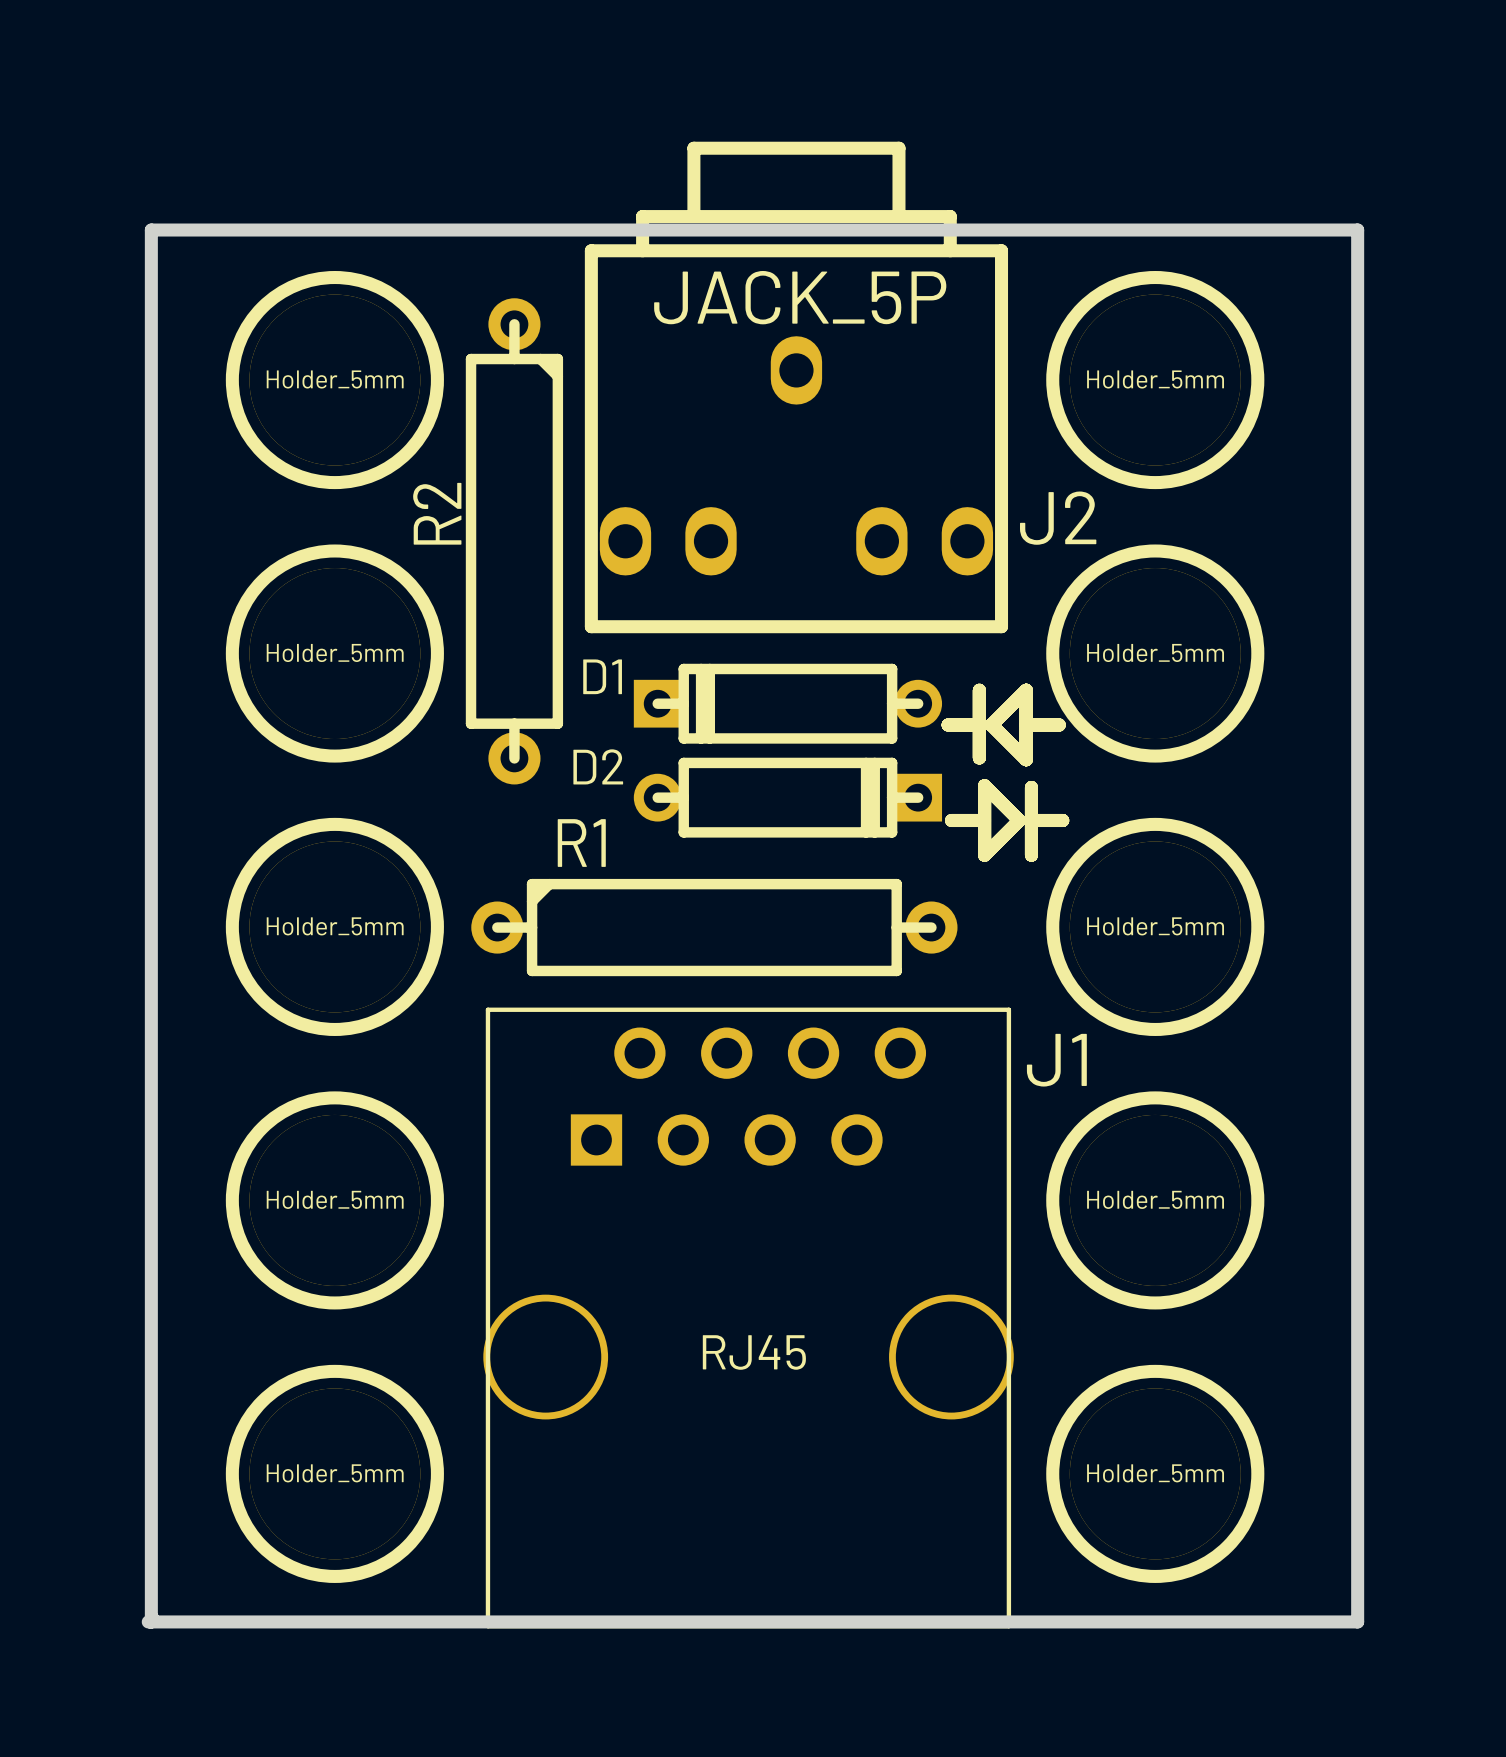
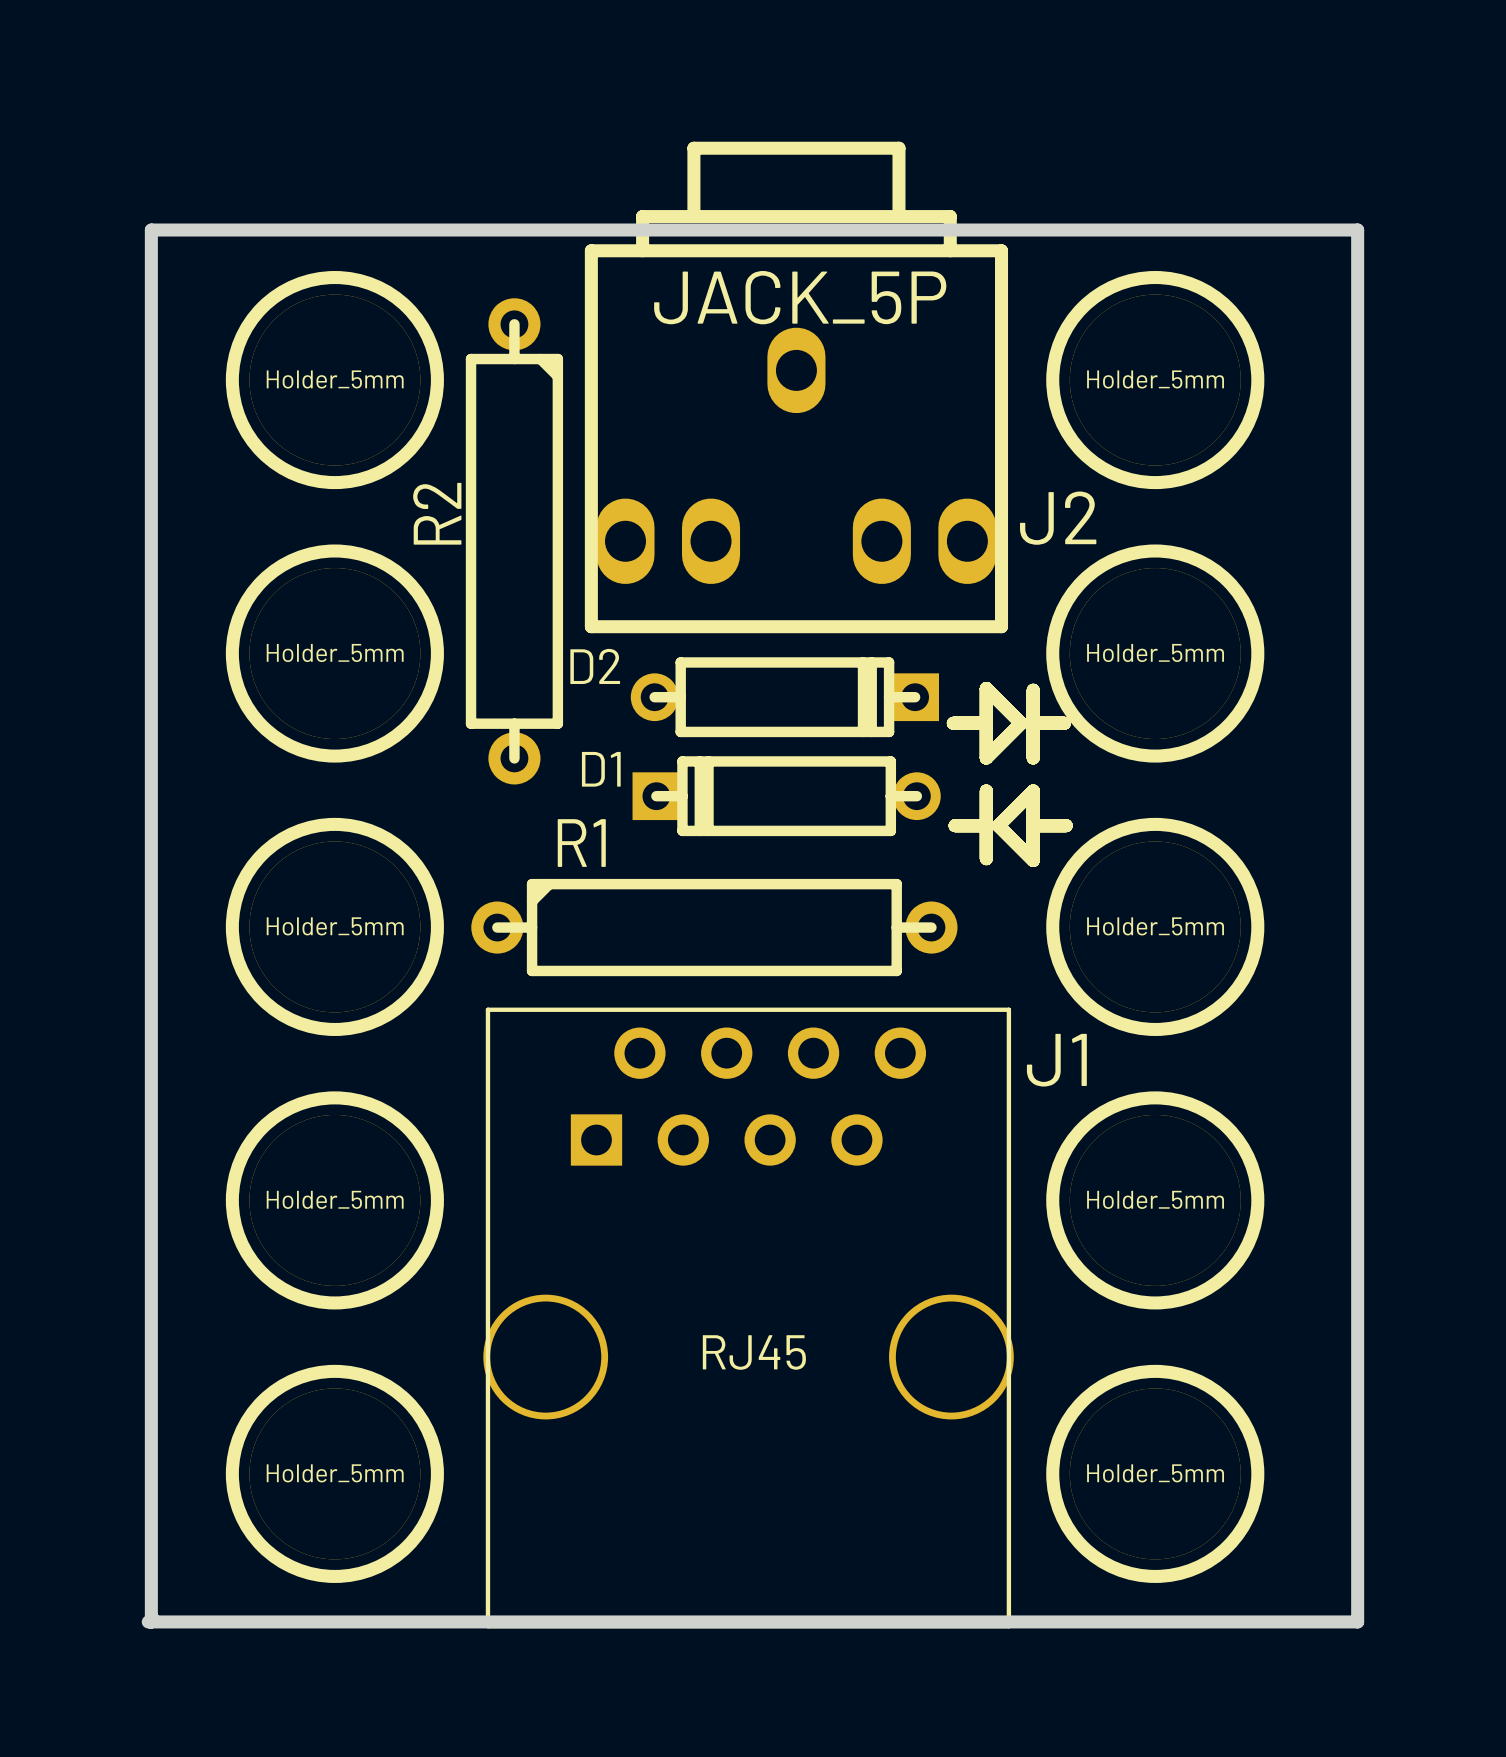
J2 footprint: [584, 141, 1009, 634] -> [584, 141, 1009, 634]
line: (979, 690) (979, 757) -> (986, 790) (986, 858)
line: (1026, 690) (1026, 759) (991, 724) (1026, 690) -> (1033, 790) (1033, 860) (998, 825) (1033, 790)
D1 position: (787, 703) -> (786, 796)
line: (948, 724) (979, 724) -> (955, 825) (986, 825)
line: (1026, 724) (1059, 724) -> (1033, 825) (1066, 825)
line: (984, 785) (984, 855) (1019, 820) (984, 785) -> (986, 688) (986, 757) (1021, 723) (986, 688)
line: (1031, 787) (1031, 855) -> (1033, 690) (1033, 757)
D2 position: (787, 797) -> (784, 697)
line: (951, 820) (984, 820) -> (953, 723) (986, 723)
line: (1031, 820) (1062, 820) -> (1033, 723) (1064, 723)

